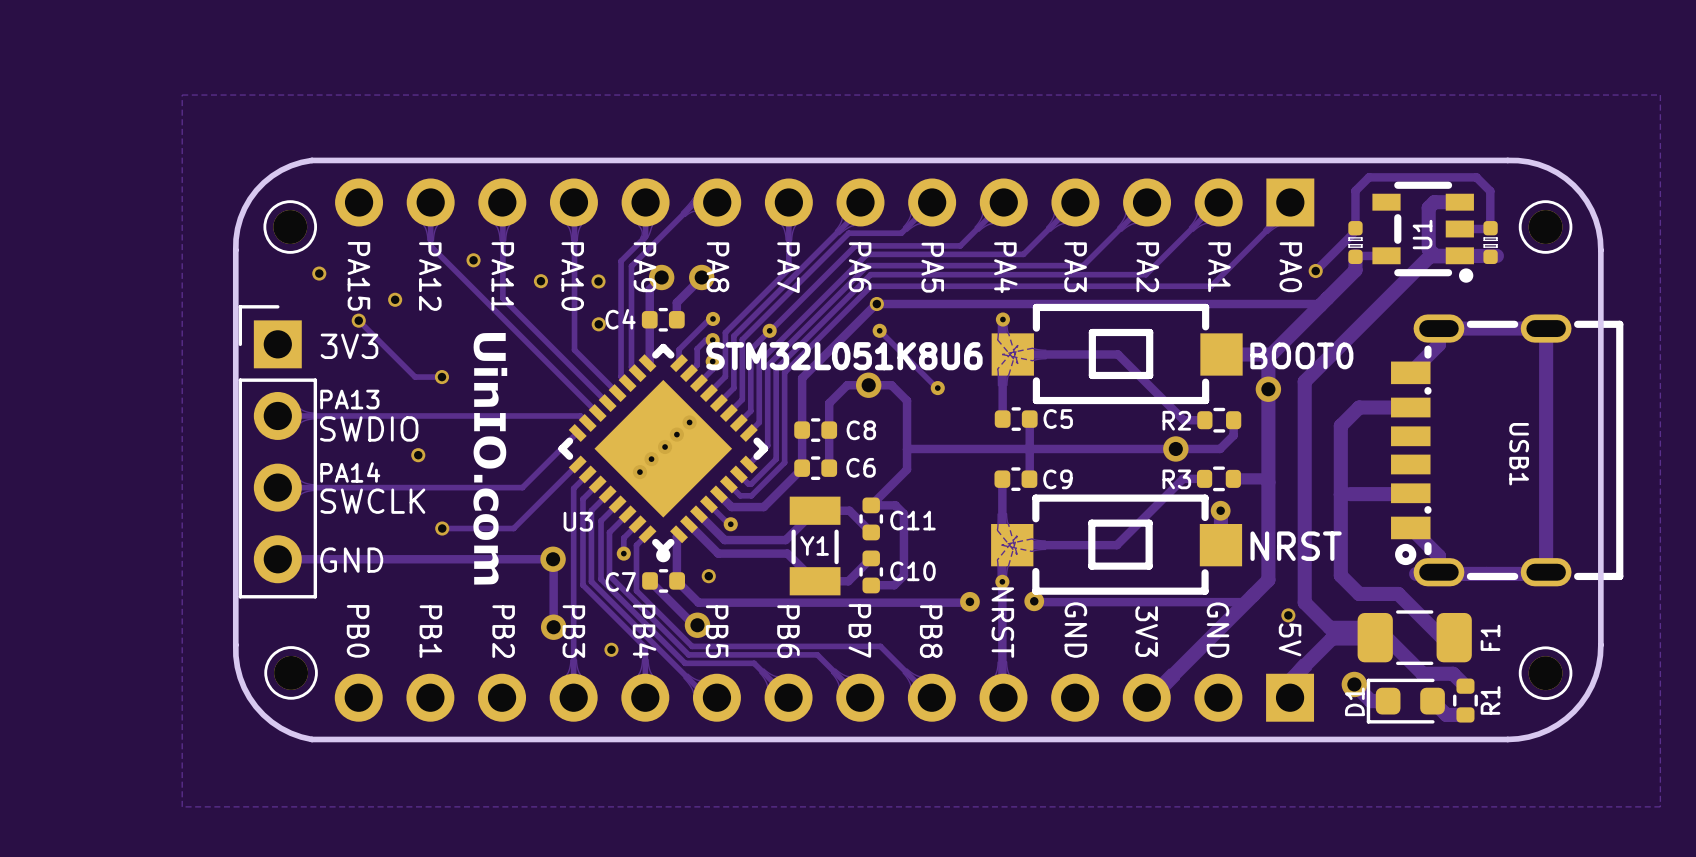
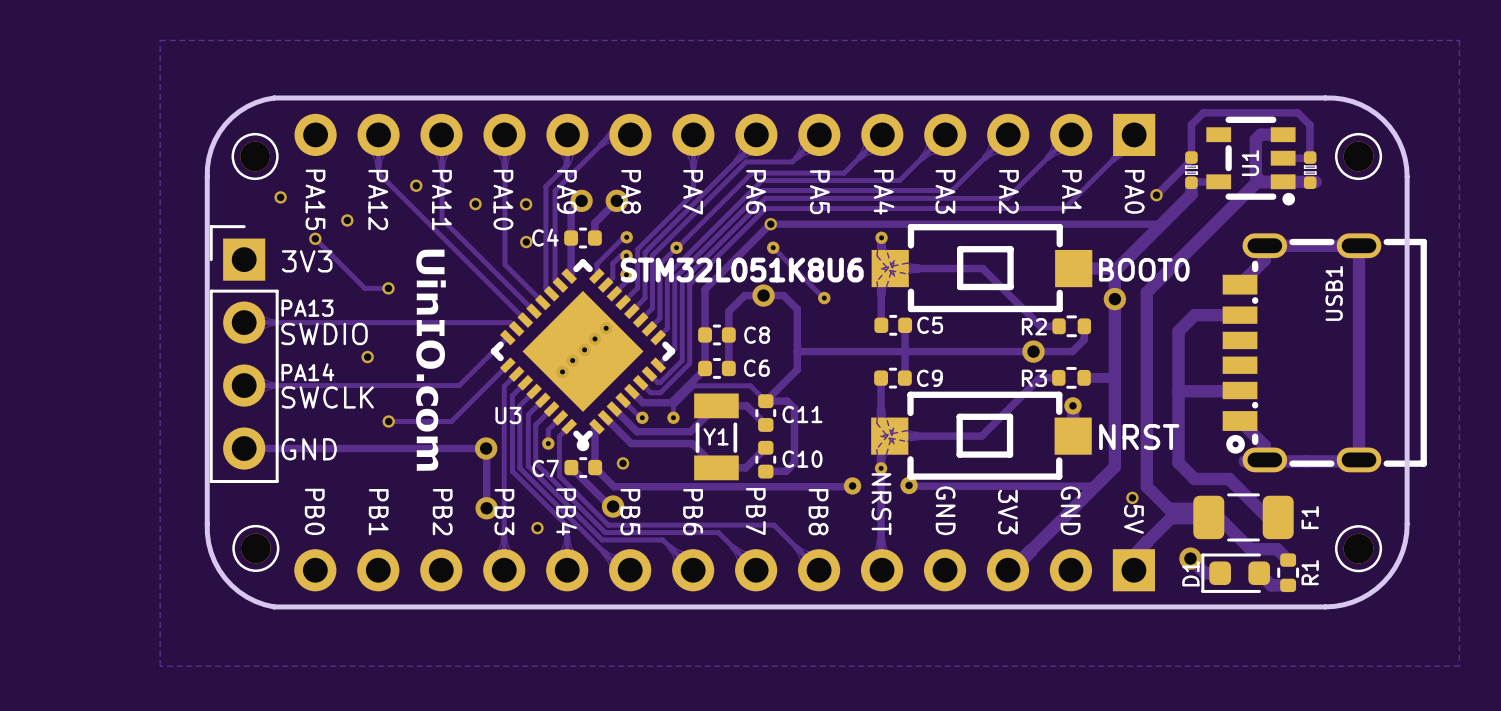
USB1 name rotation: 0° (1519, 454) -> 180° (1334, 293)
USB1 name position: USB1 (1519, 454) -> USB1 (1334, 293)
track: none -> (765, 401) (750, 385) (693, 385) (673, 405) (673, 417)
via: none -> (673, 417)

